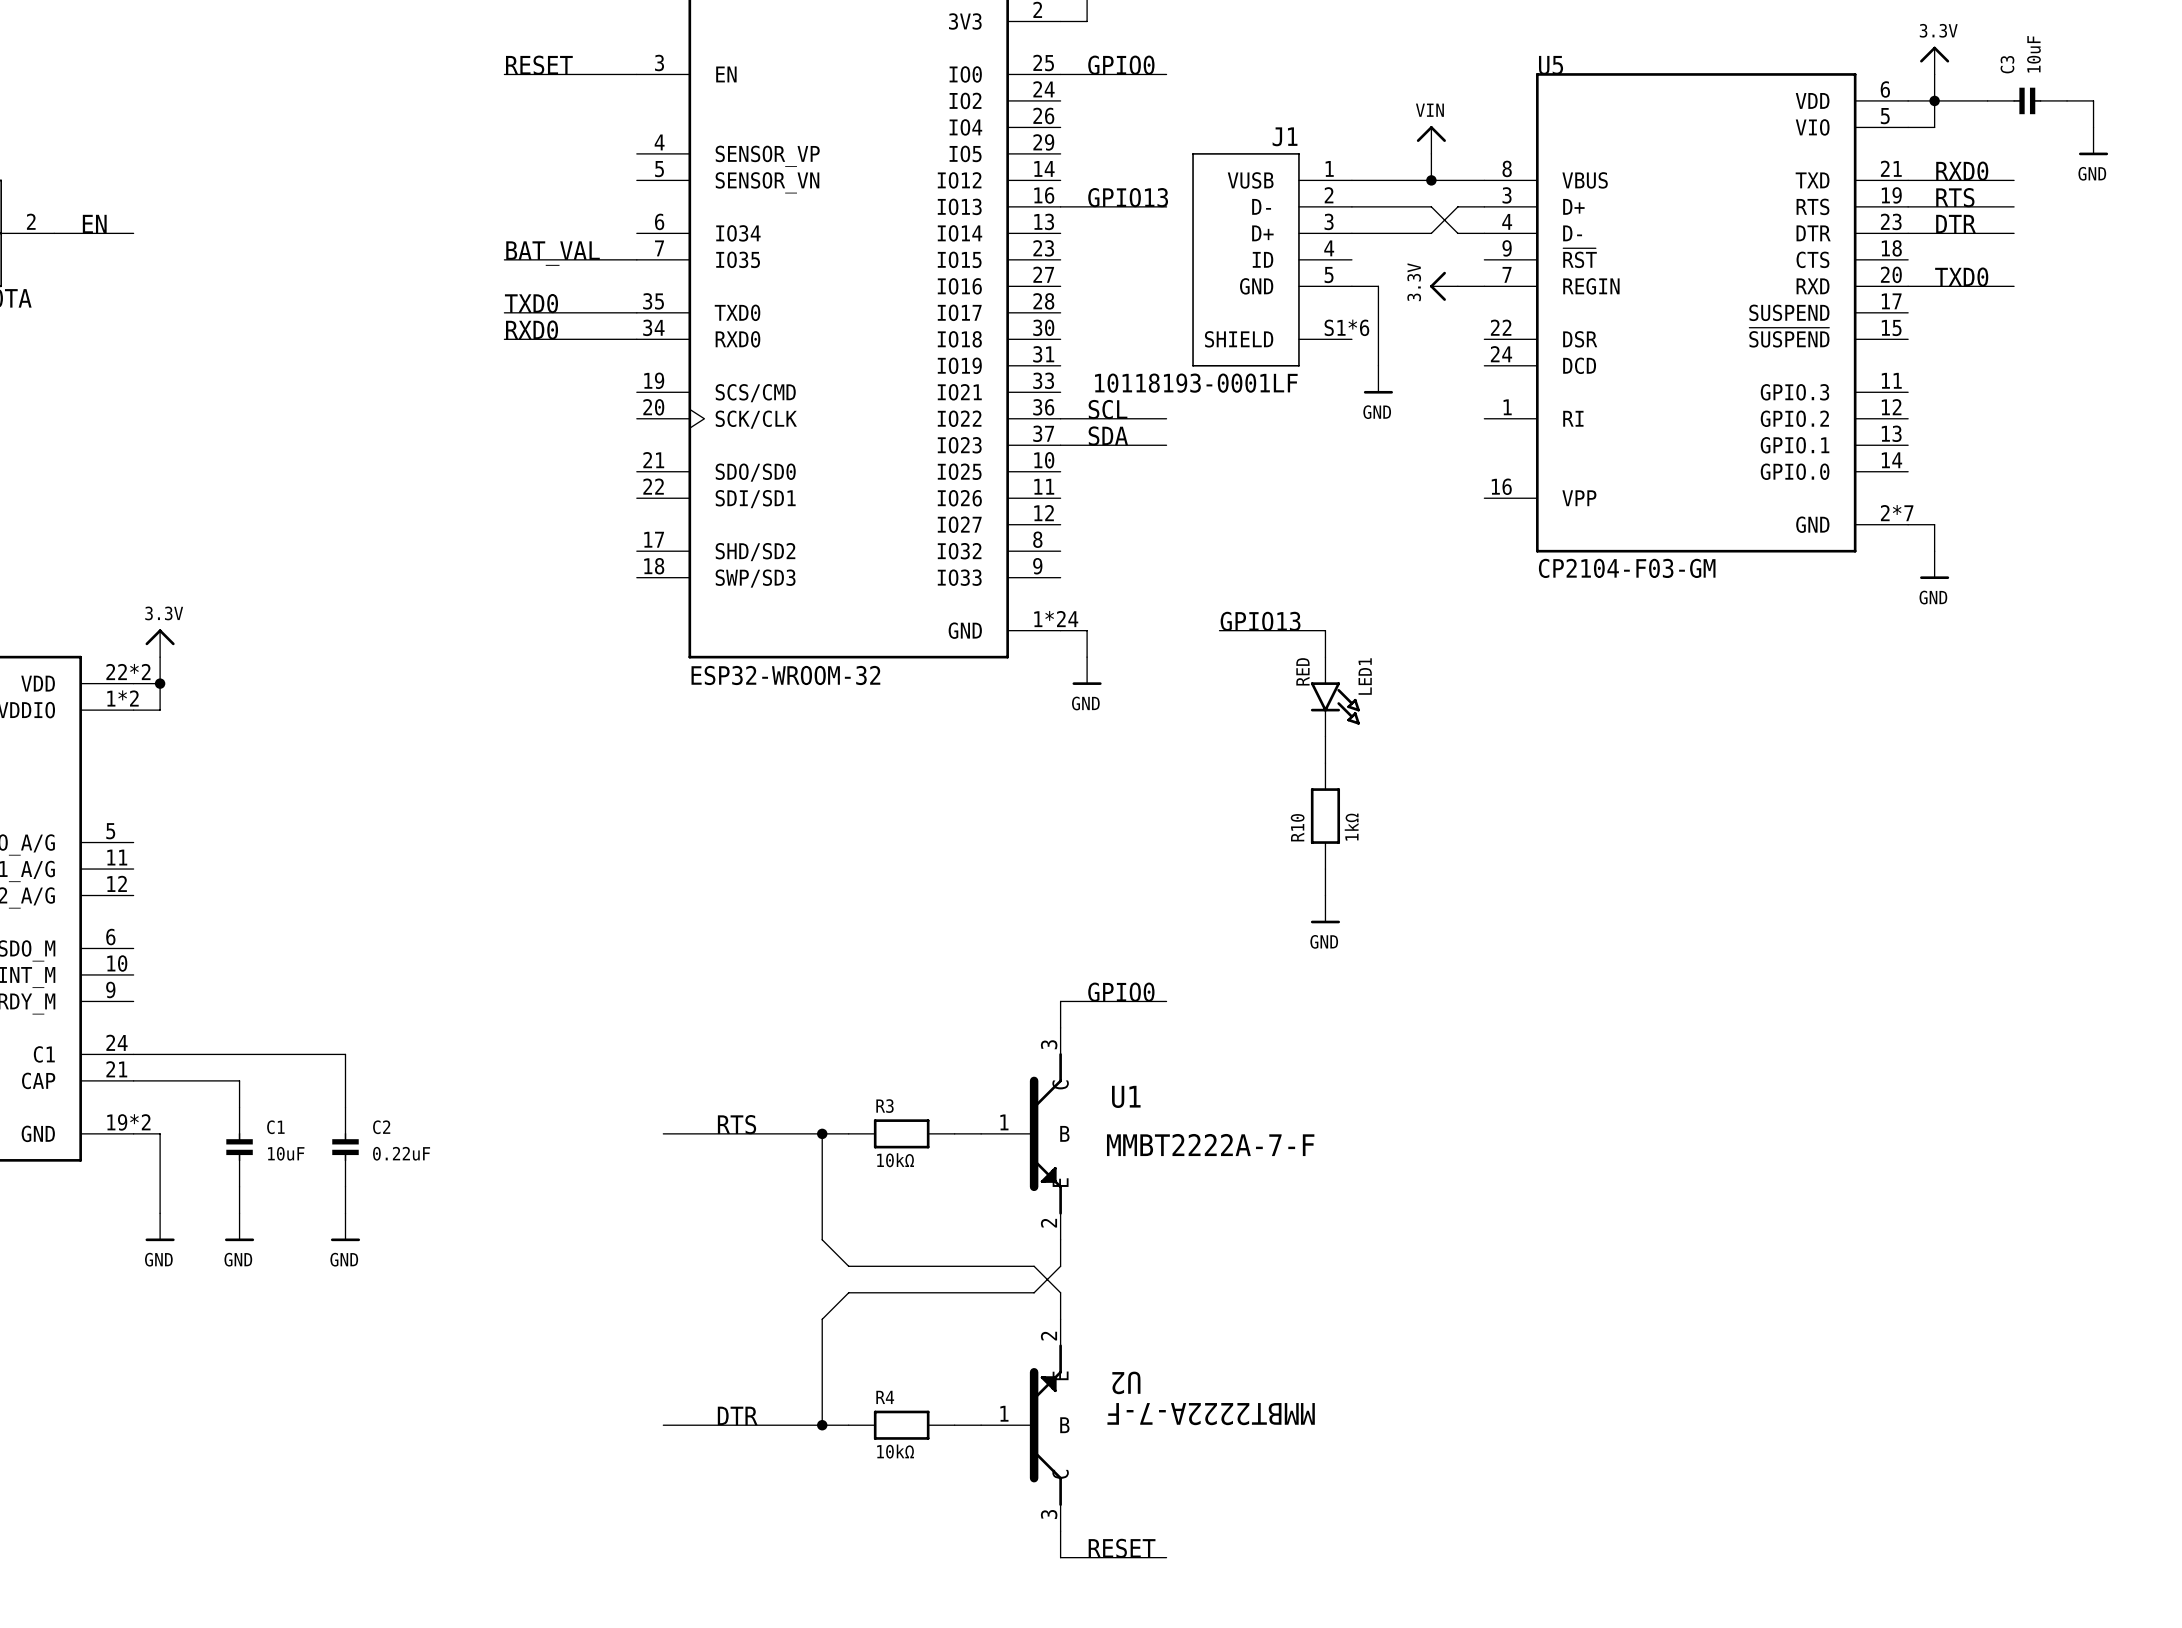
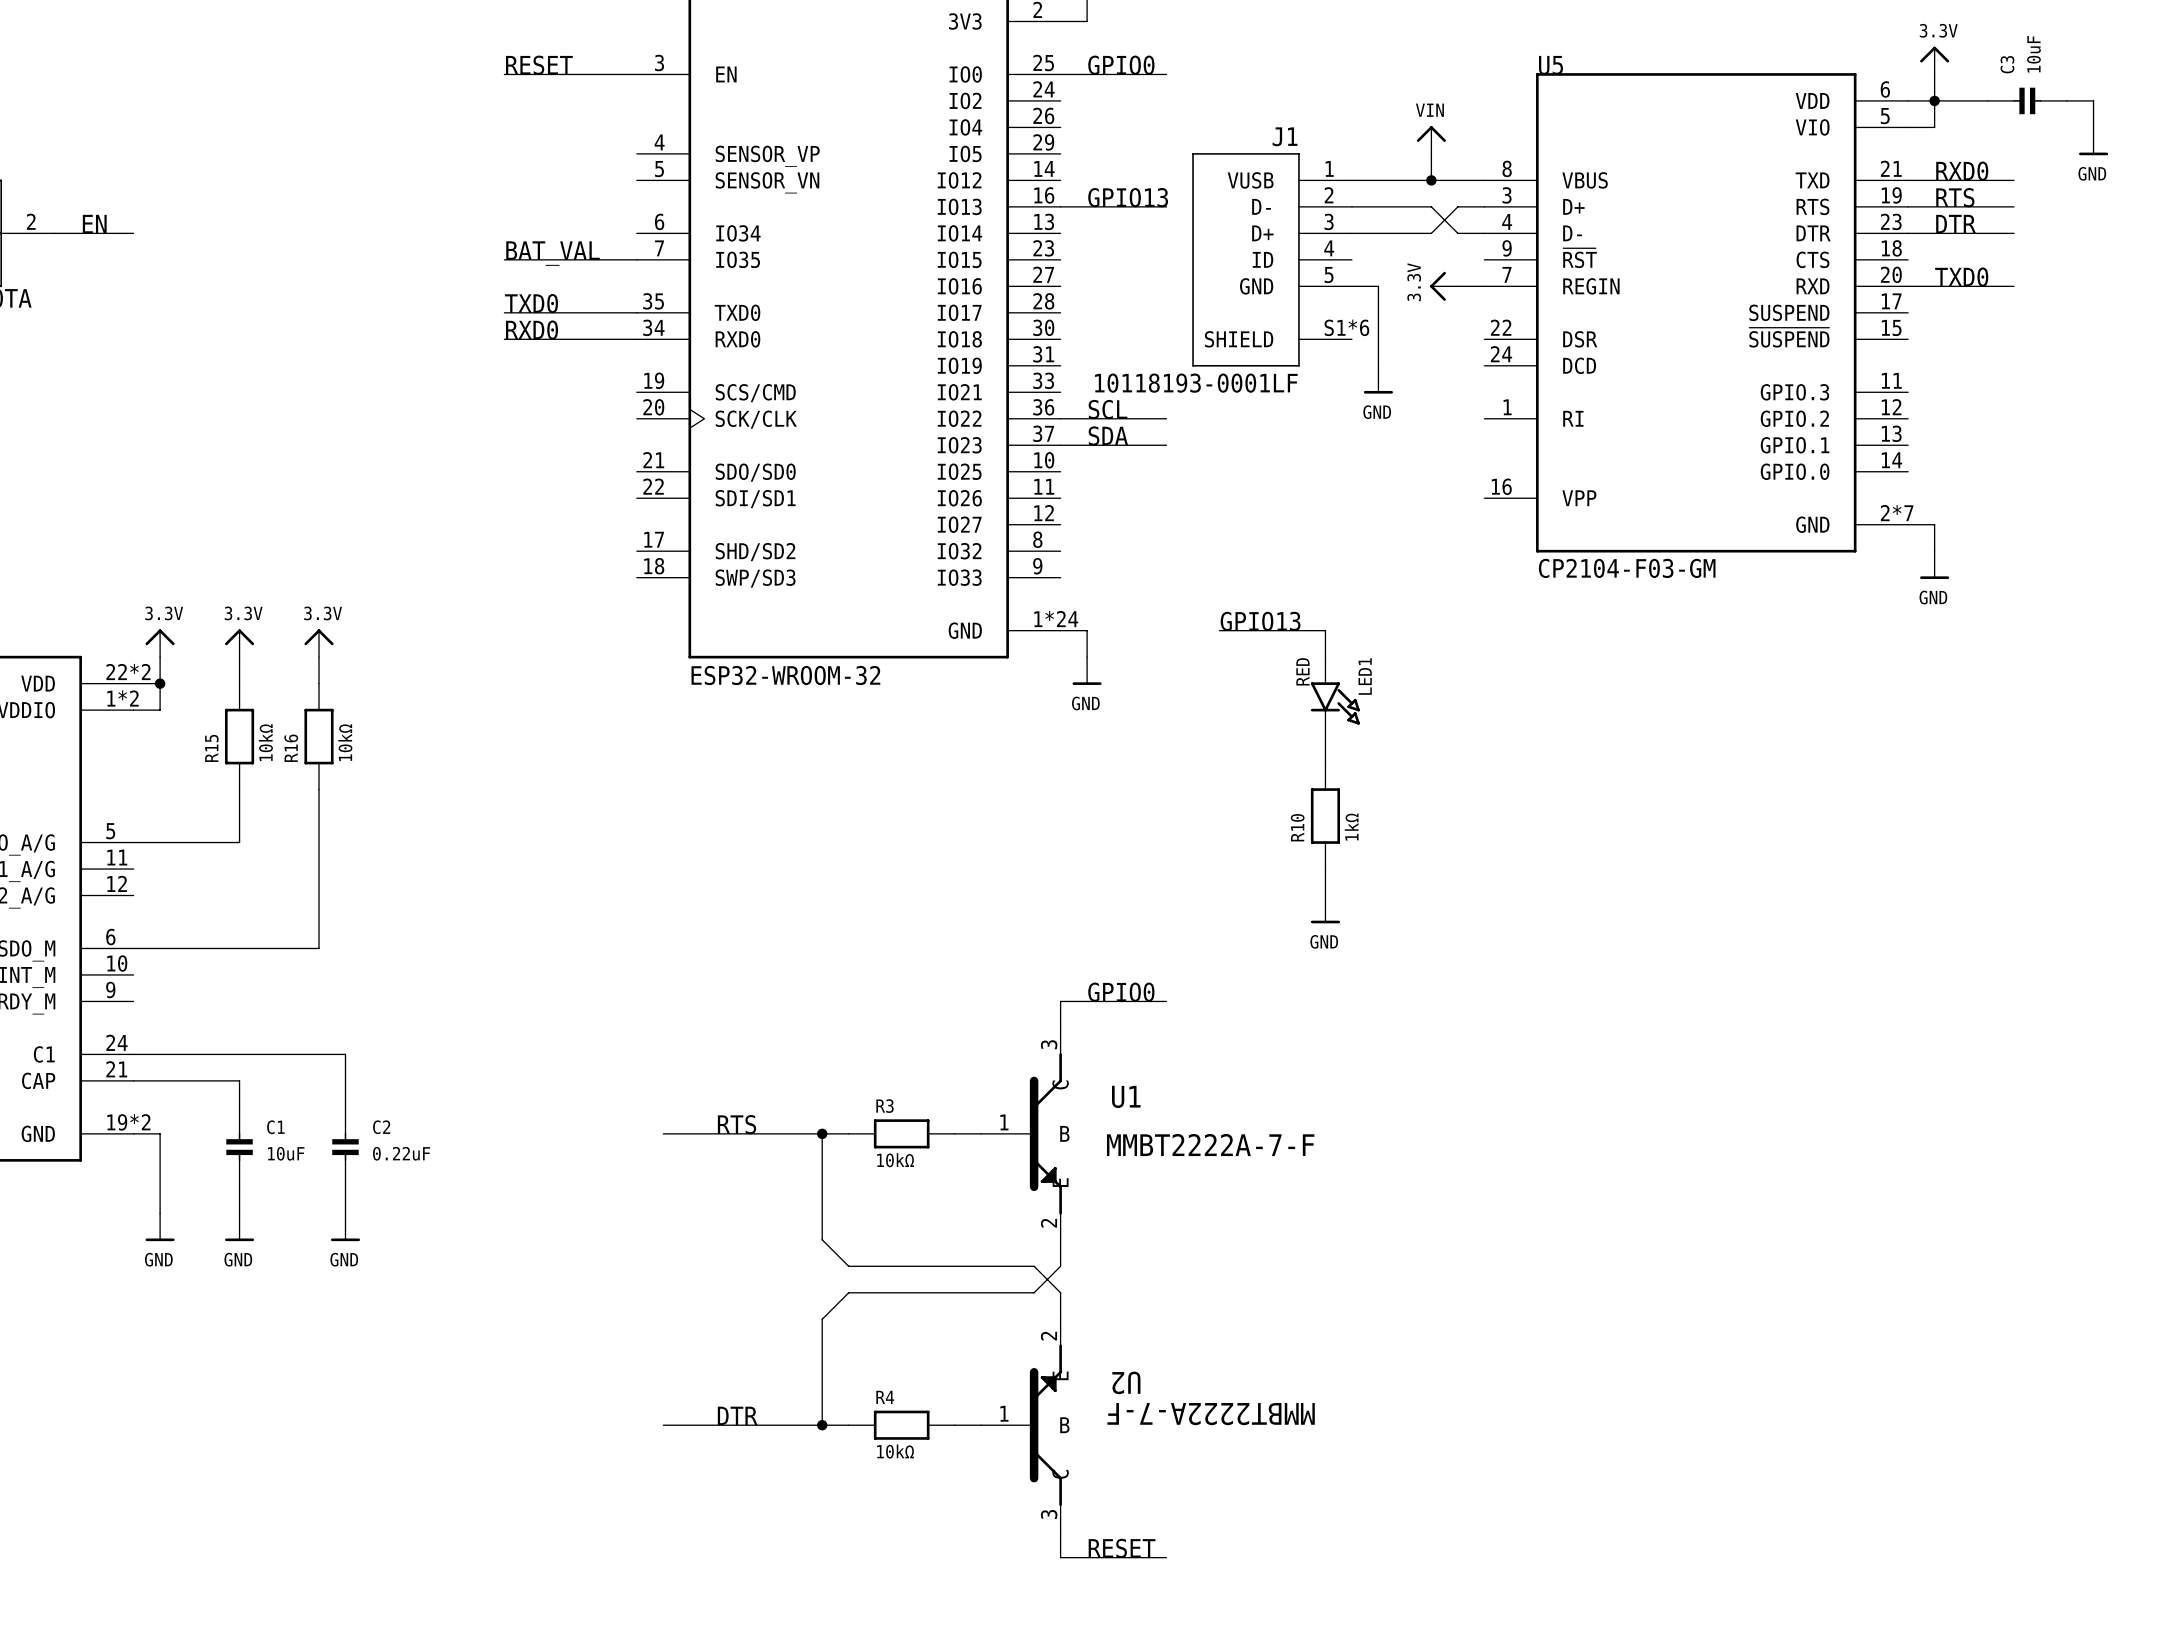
power symbol: none -> 3.3V (239, 643)
power symbol: none -> 3.3V (319, 643)
wire: none -> (239, 657) (239, 683)
wire: none -> (319, 657) (319, 683)
R15: none -> 10kΩ (239, 736)
R16: none -> 10kΩ (319, 736)
wire: none -> (239, 789) (239, 842) (133, 842)
wire: none -> (319, 789) (319, 948) (133, 948)

